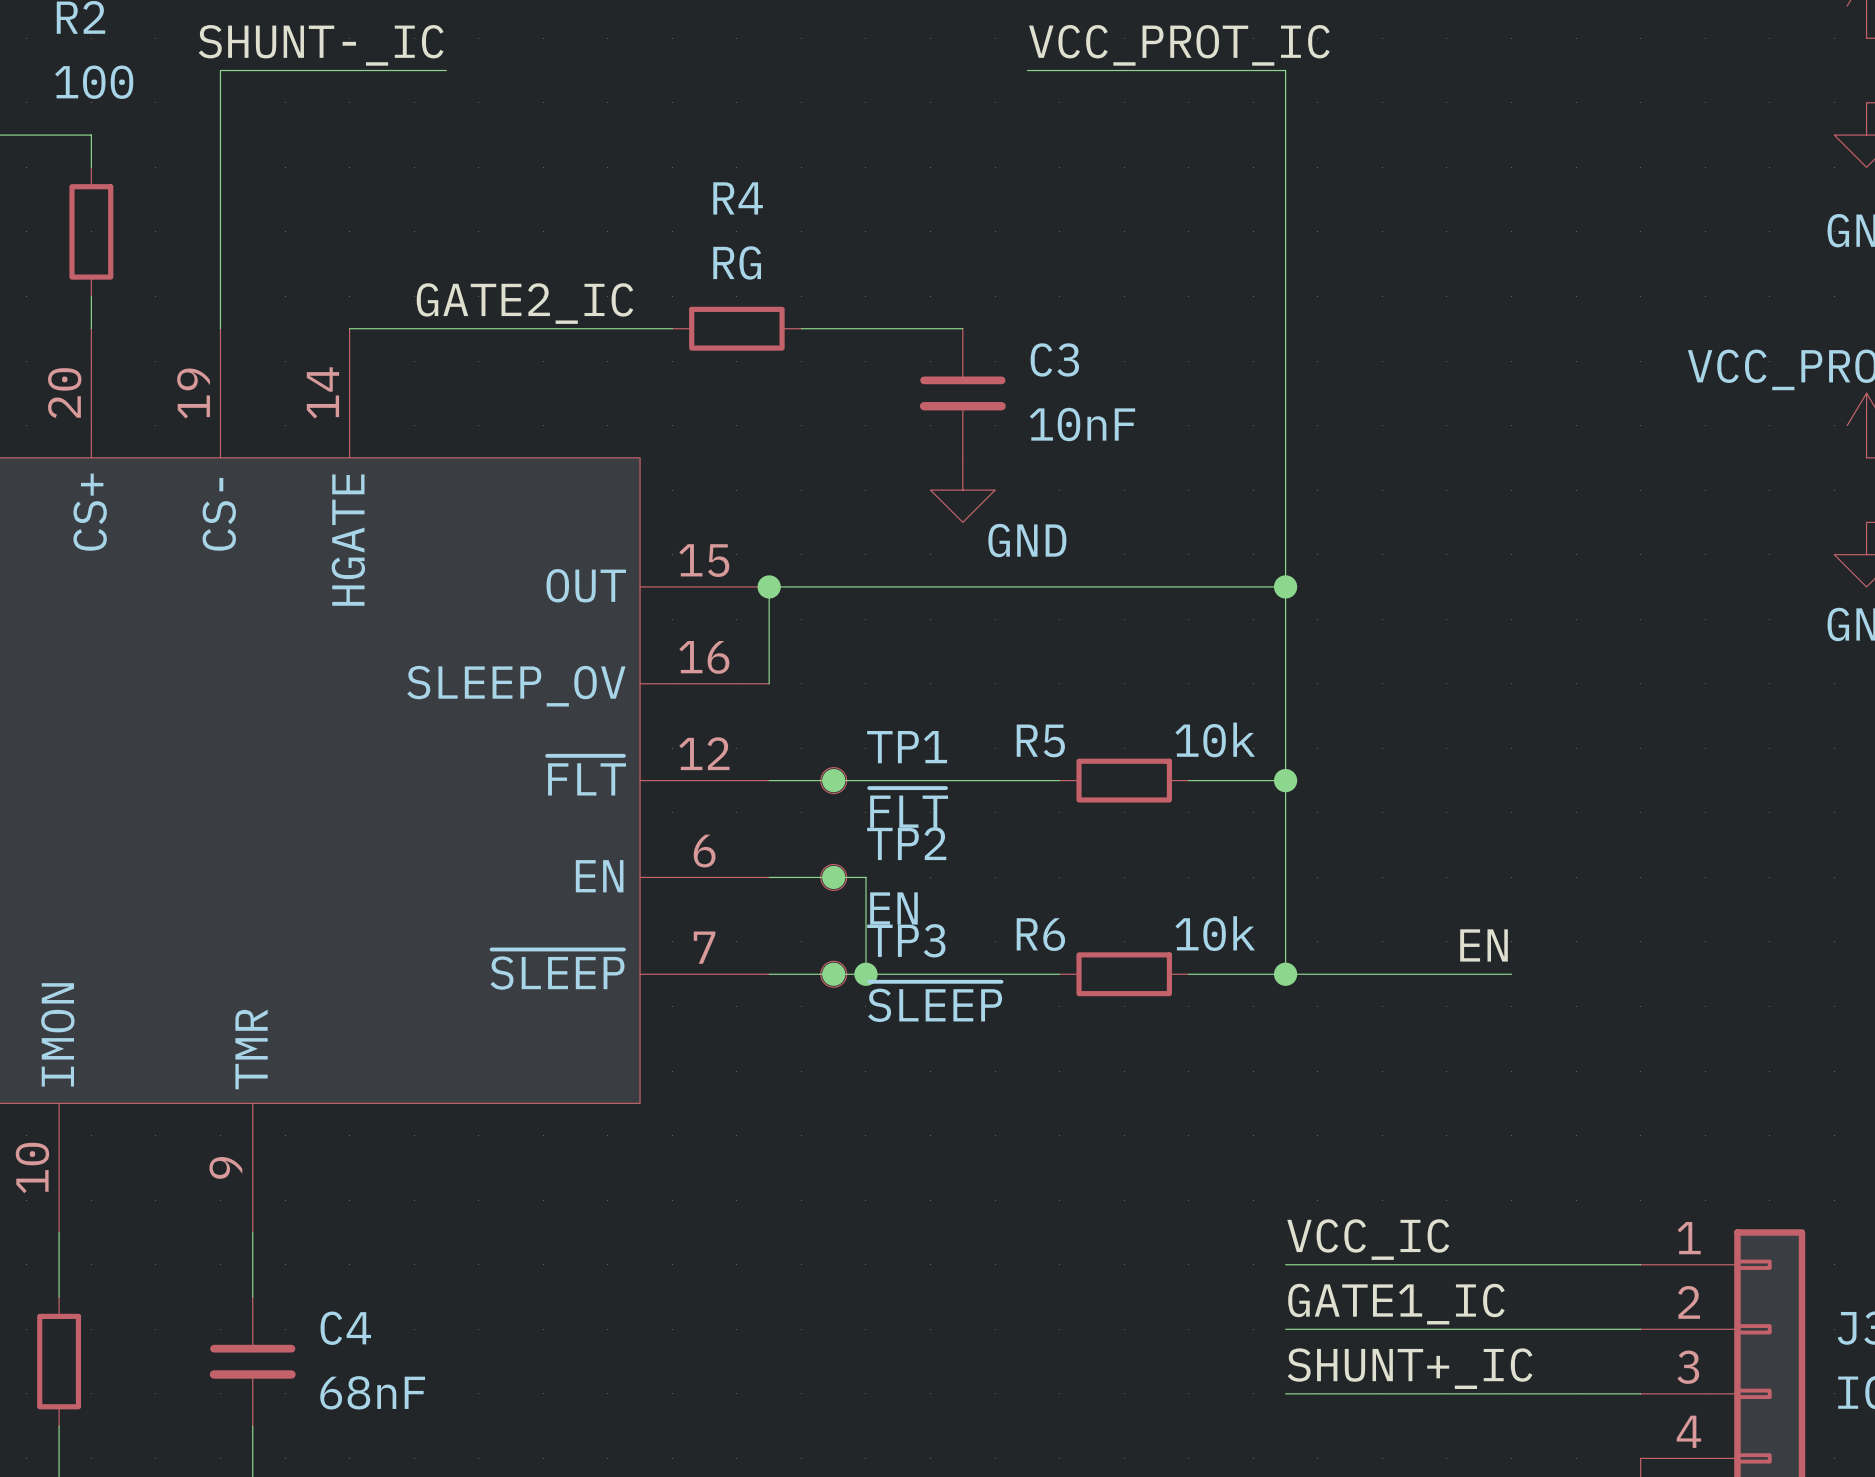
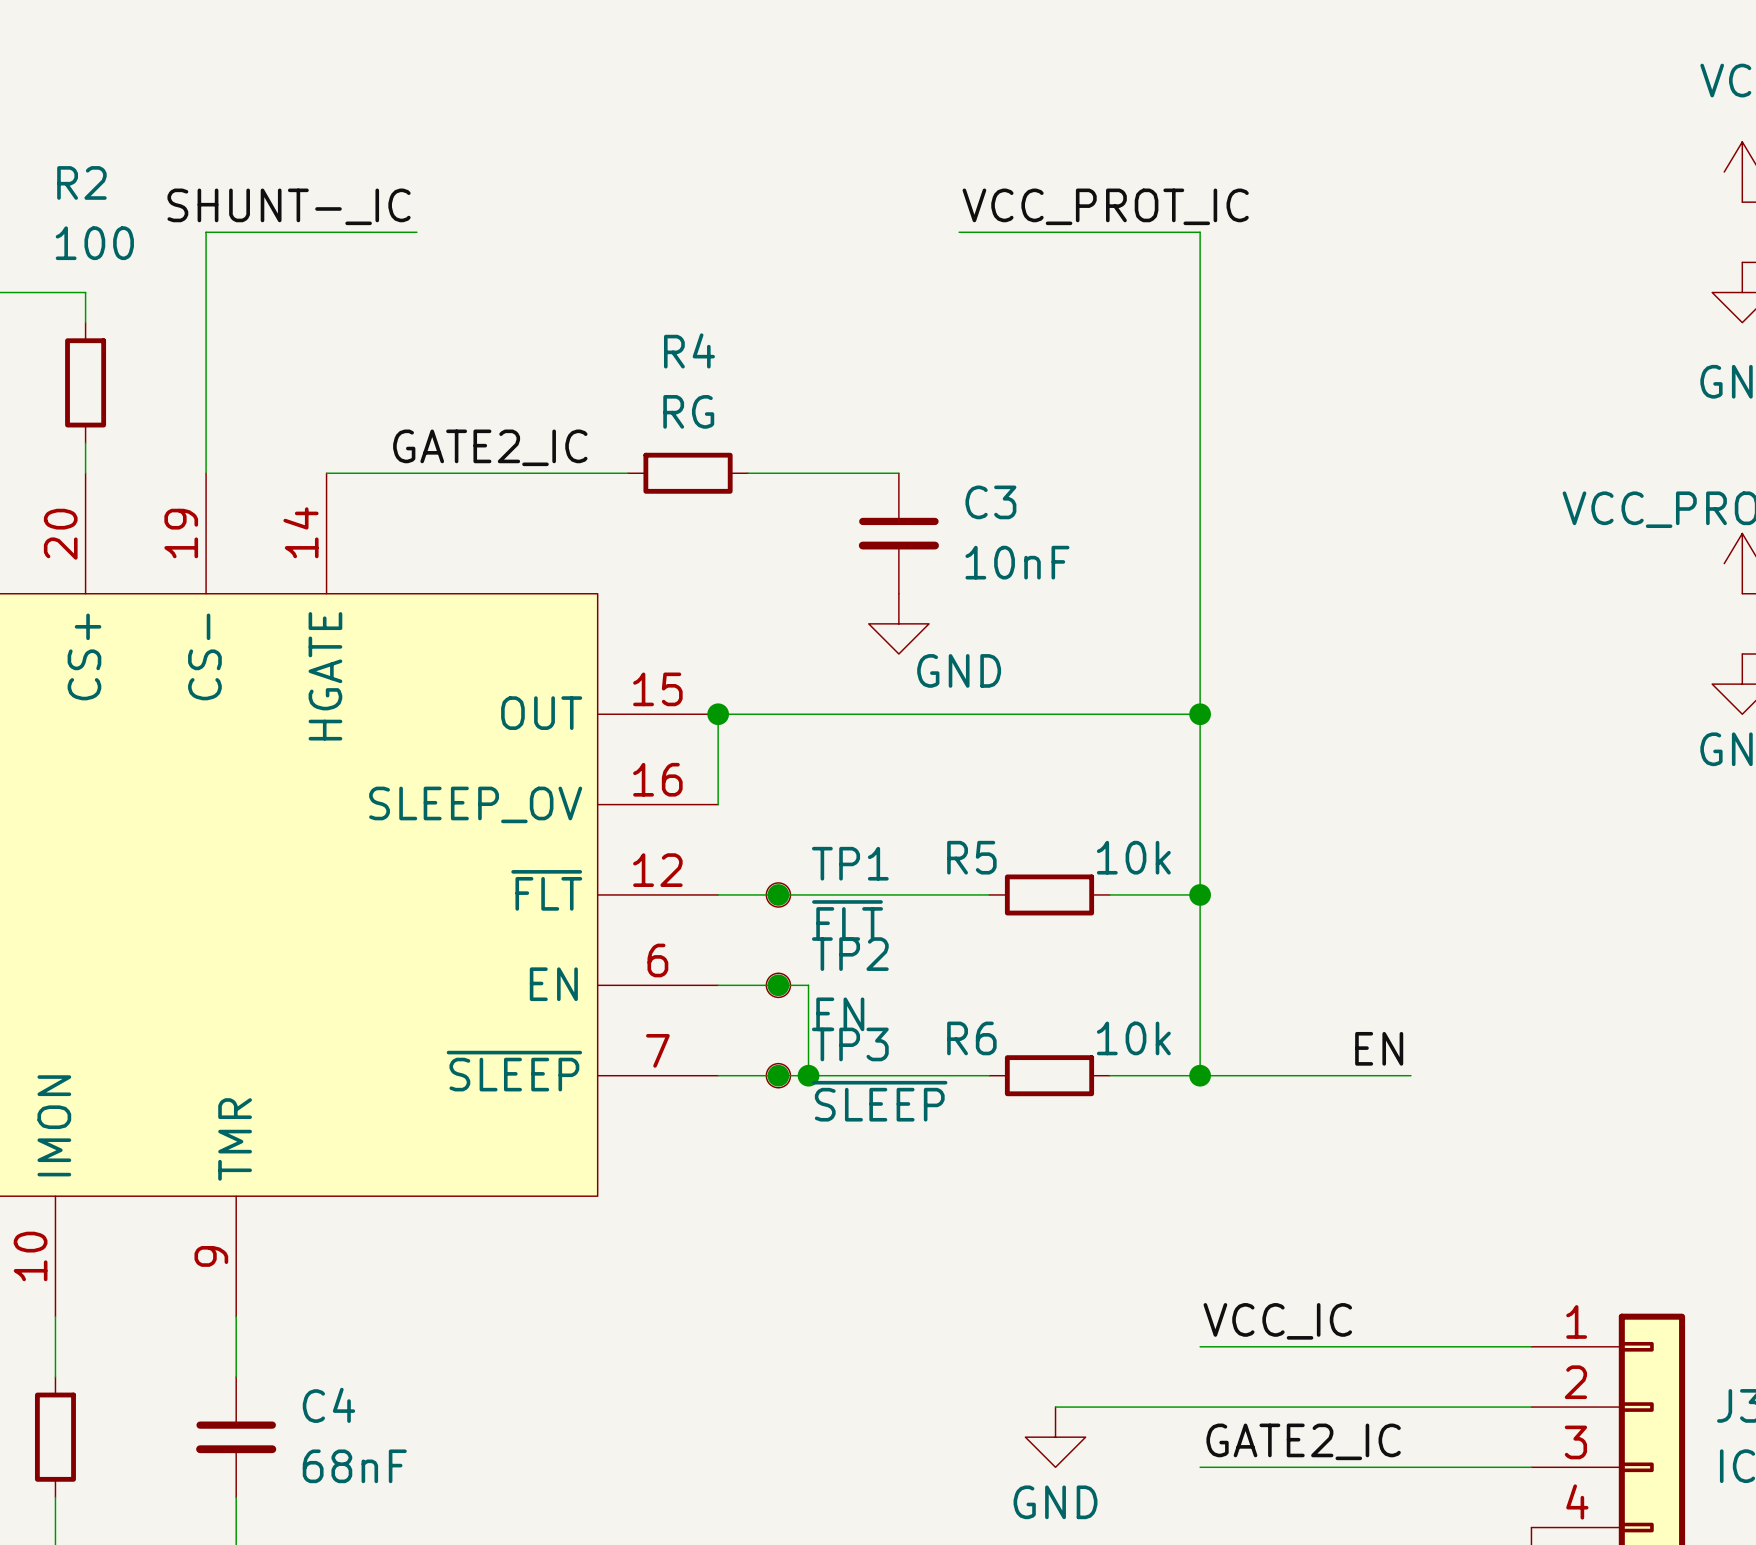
label: GATE1_IC (1396, 1304) -> none
wire: none -> (1055, 1407) (1200, 1407)
power symbol: none -> GND (1055, 1437)
label: SHUNT+_IC (1410, 1368) -> GATE2_IC (1303, 1441)

